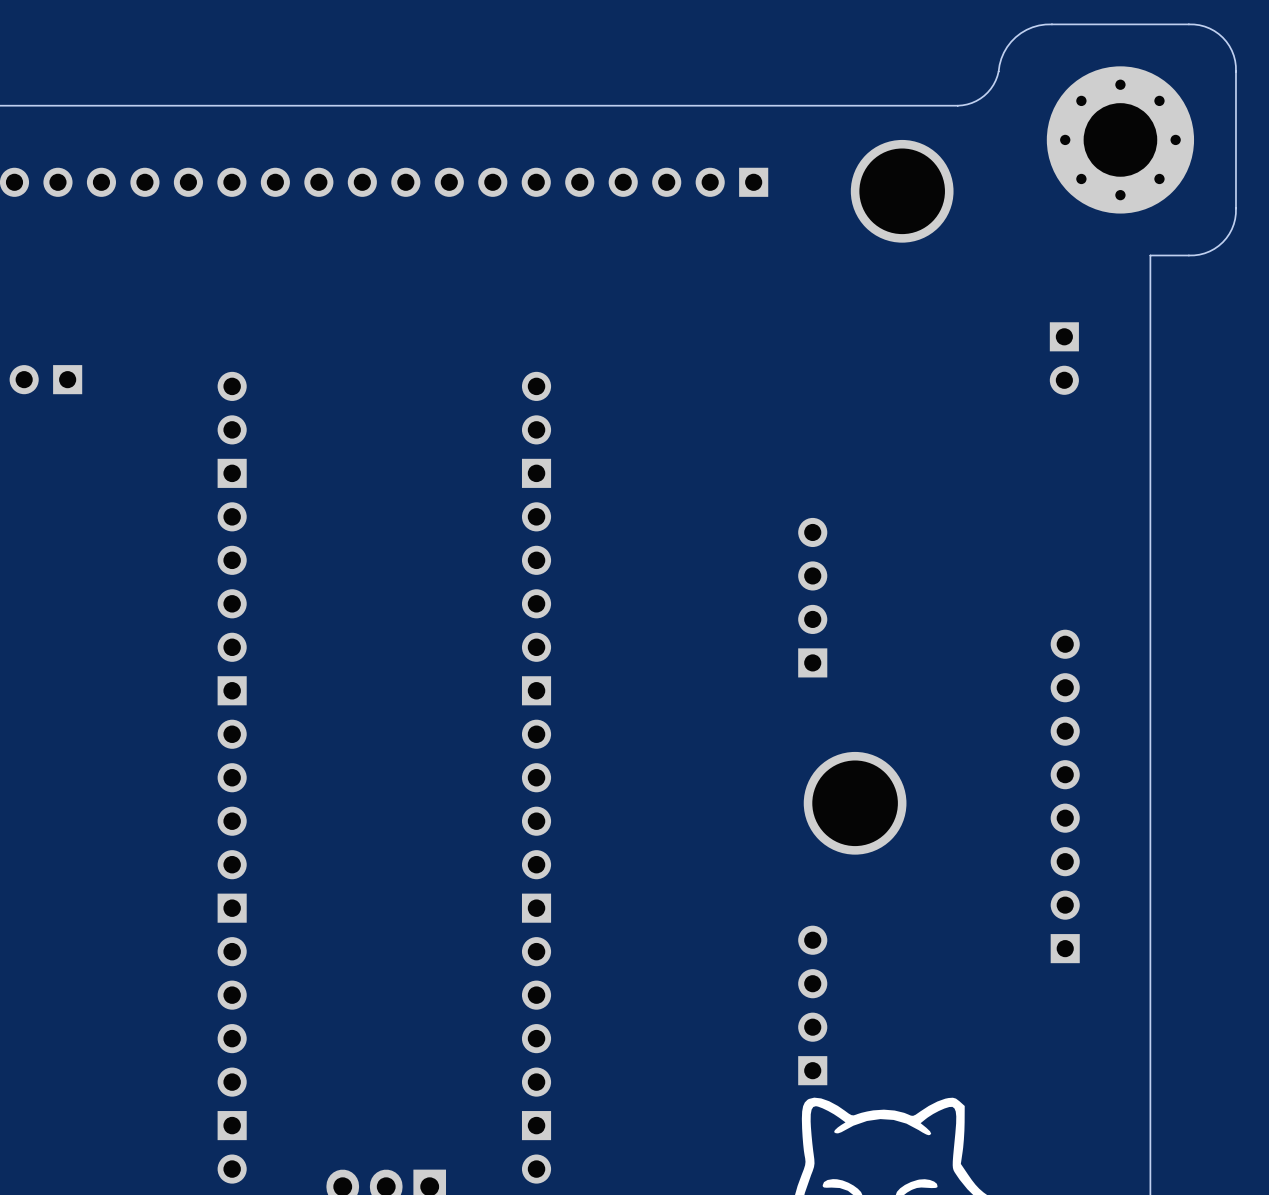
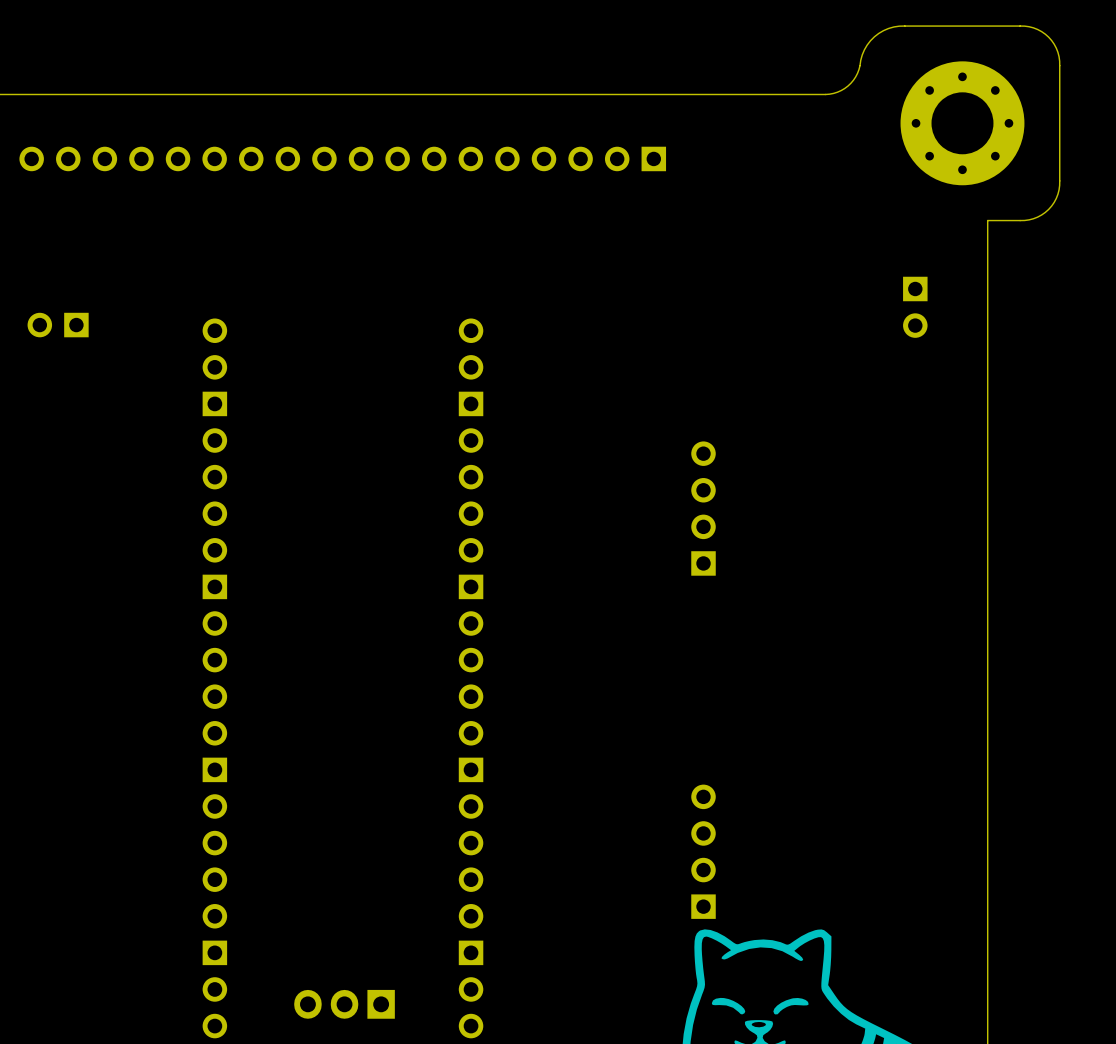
part: (902, 191) -> none
part: (1065, 796) -> none
part: (855, 803) -> none

